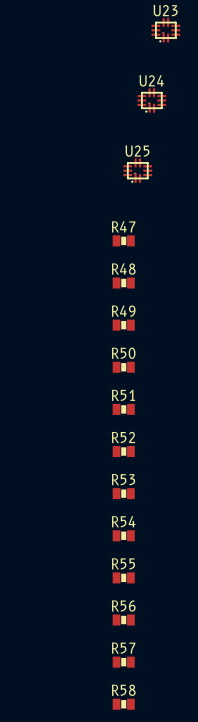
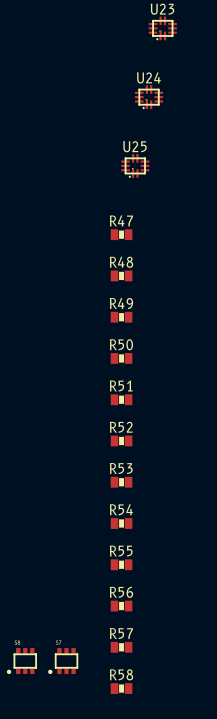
part: none -> (21, 661)
part: none -> (63, 661)

